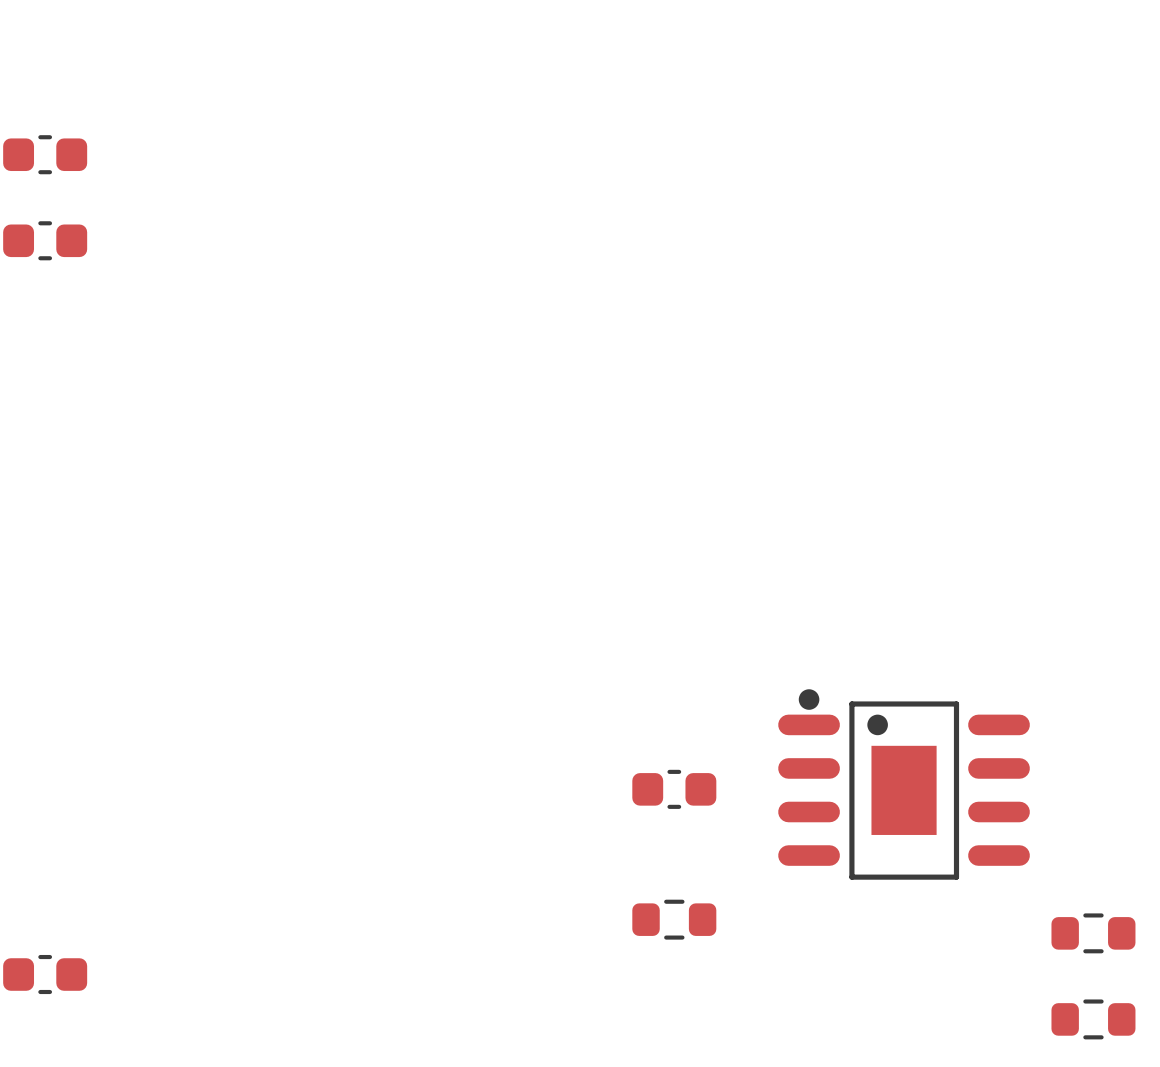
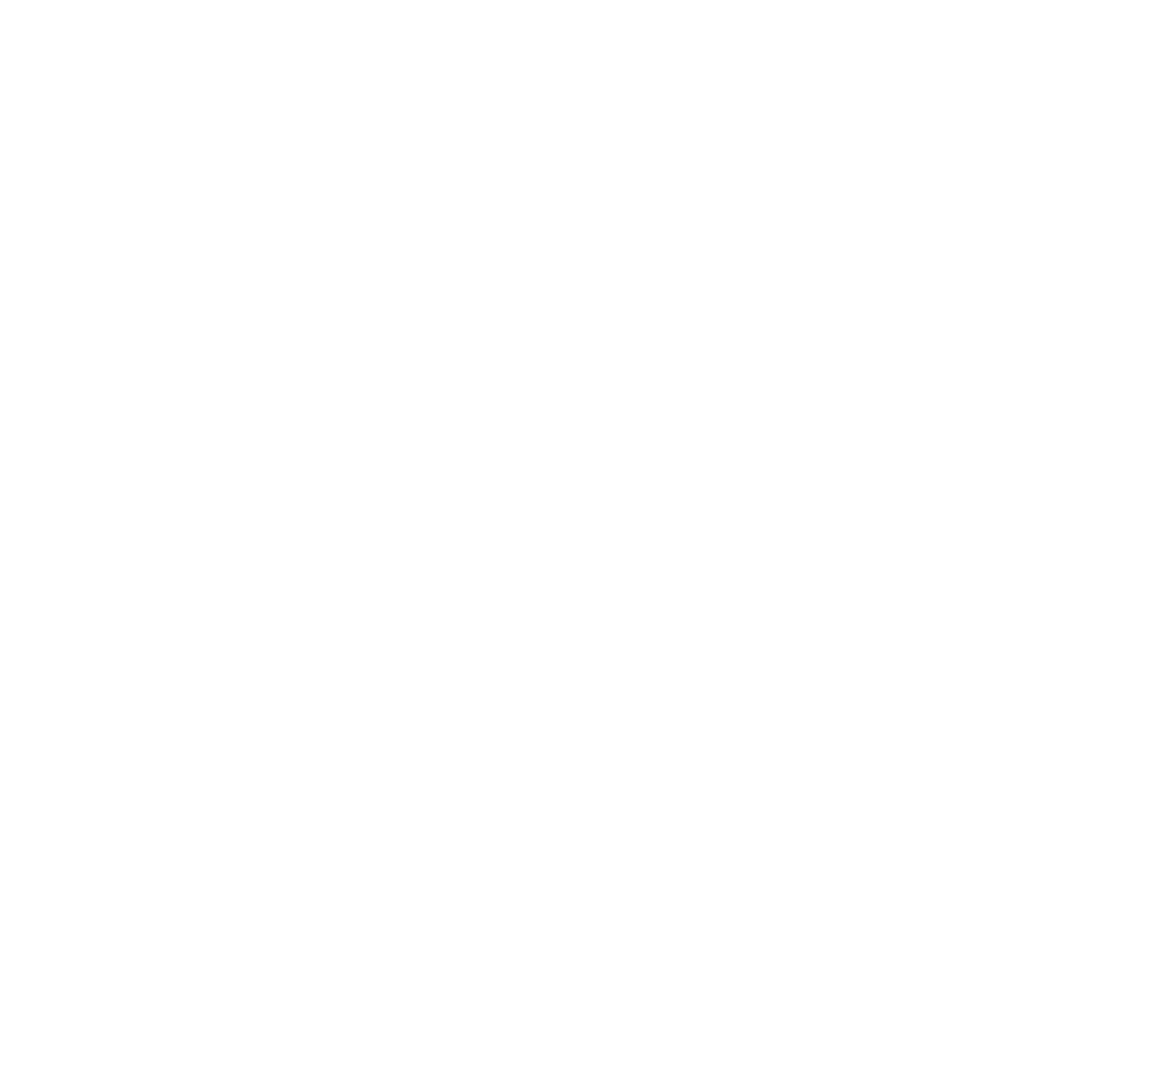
part: (45, 154) -> none
part: (45, 240) -> none
part: (904, 784) -> none
part: (674, 789) -> none
part: (674, 919) -> none
part: (1093, 933) -> none
part: (45, 974) -> none
part: (1093, 1019) -> none

